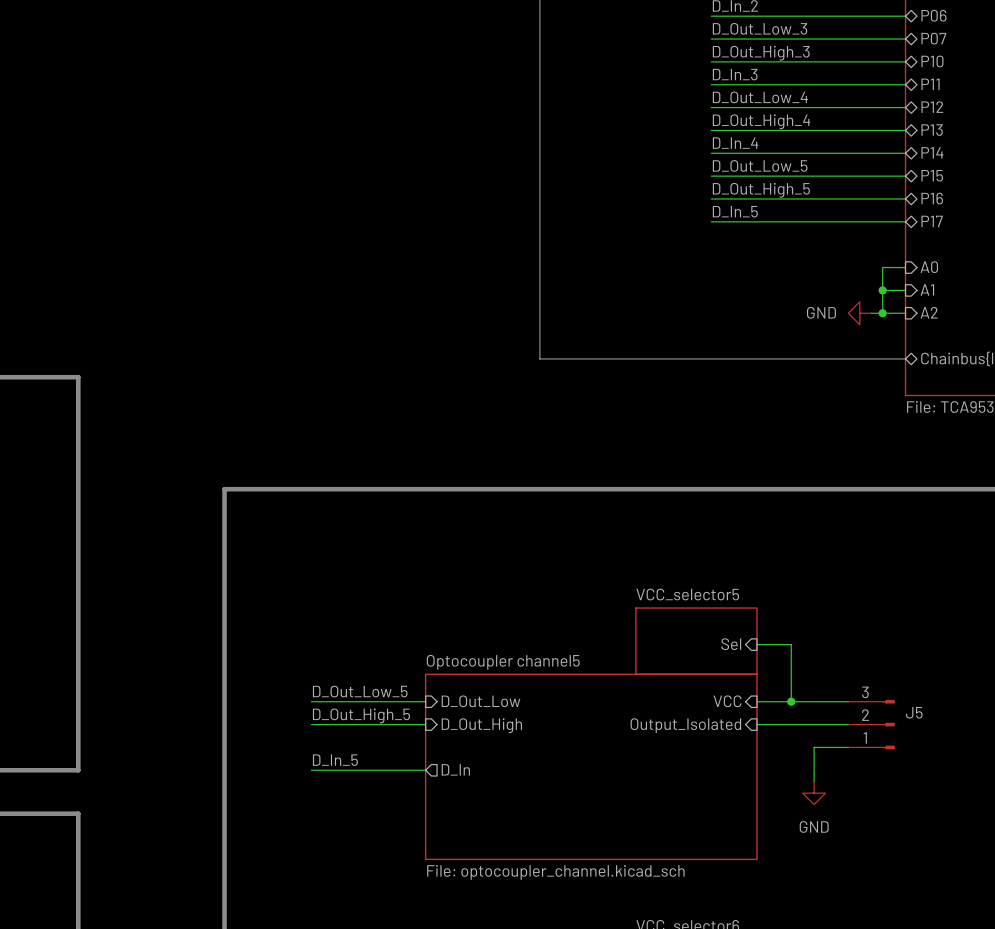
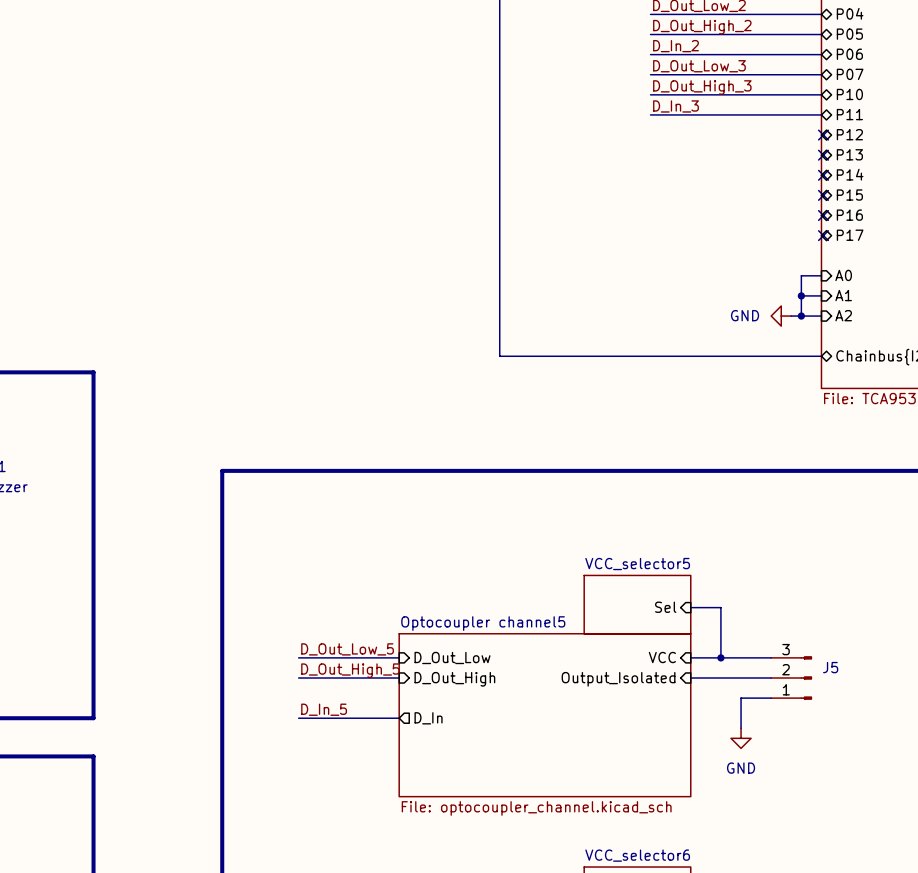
label: D_Out_Low_4 (760, 97) -> none
wire: (711, 107) (905, 107) -> none
no-connect mark: none -> (823, 135)
label: D_Out_High_4 (761, 121) -> none
wire: (711, 130) (905, 130) -> none
no-connect mark: none -> (823, 155)
label: D_In_4 (735, 143) -> none
wire: (711, 153) (905, 153) -> none
no-connect mark: none -> (823, 175)
label: D_Out_Low_5 (760, 165) -> none
wire: (711, 176) (905, 176) -> none
no-connect mark: none -> (823, 195)
label: D_Out_High_5 (761, 190) -> none
wire: (711, 198) (905, 198) -> none
no-connect mark: none -> (823, 215)
label: D_In_5 (735, 211) -> none
wire: (711, 221) (905, 221) -> none
no-connect mark: none -> (823, 235)

